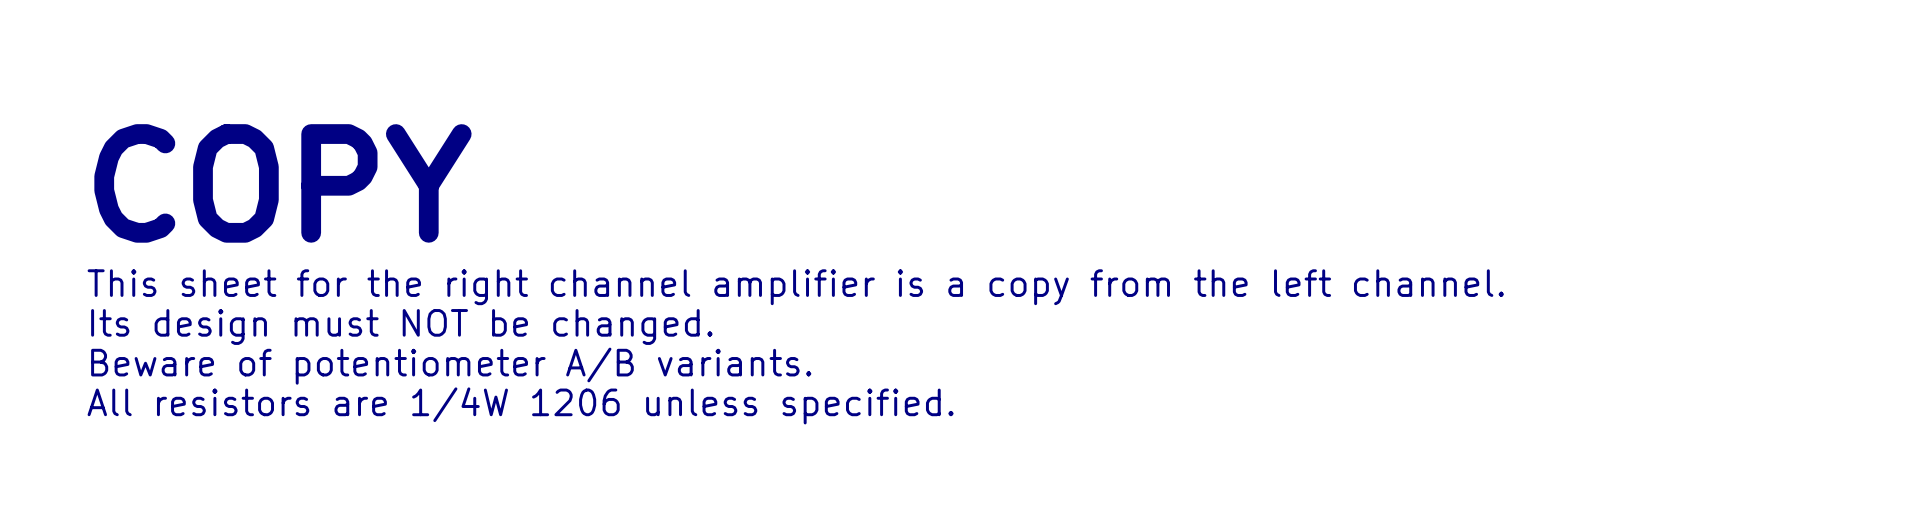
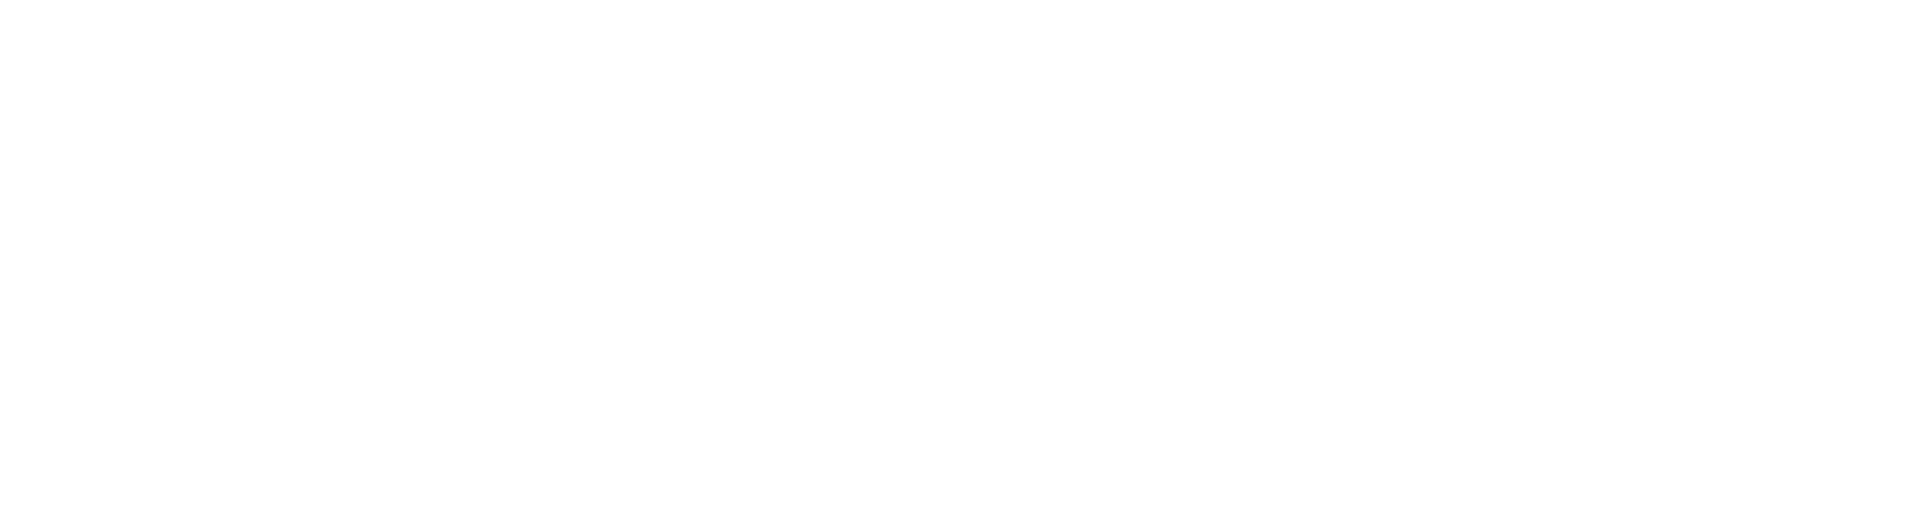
text: COPY (282, 183) -> none
text: This sheet for the right channel amplifier is a copy from the left channel. (795, 287) -> none
text: Its design must NOT be changed. (401, 326) -> none
text: Beware of potentiometer A/B variants. (451, 366) -> none
text: All resistors are 1/4W 1206 unless specified. (520, 405) -> none

